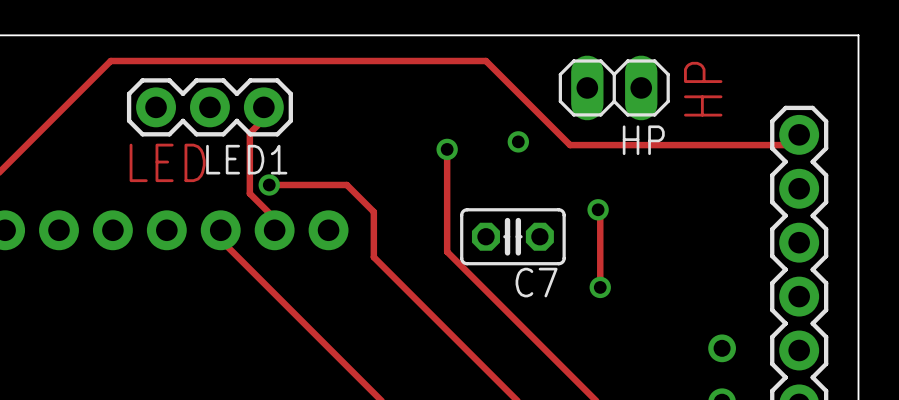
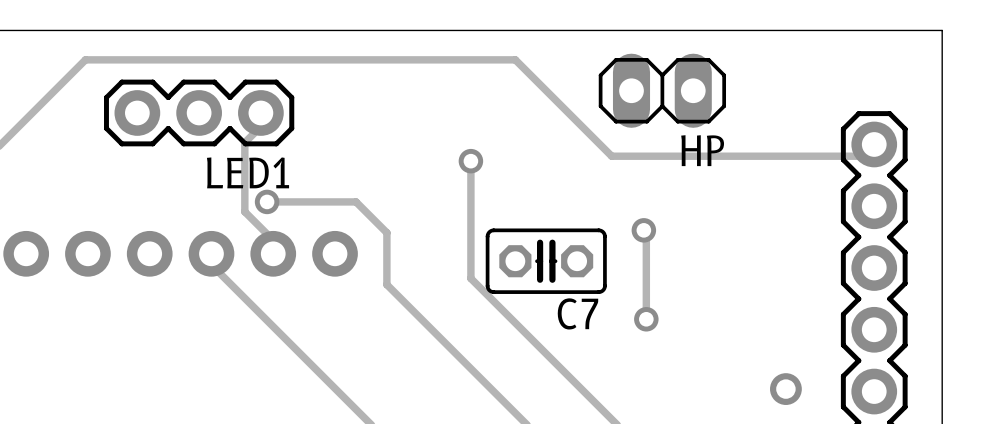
text: HP (703, 89) -> none
via: (518, 141) -> none
text: LED (167, 162) -> none

